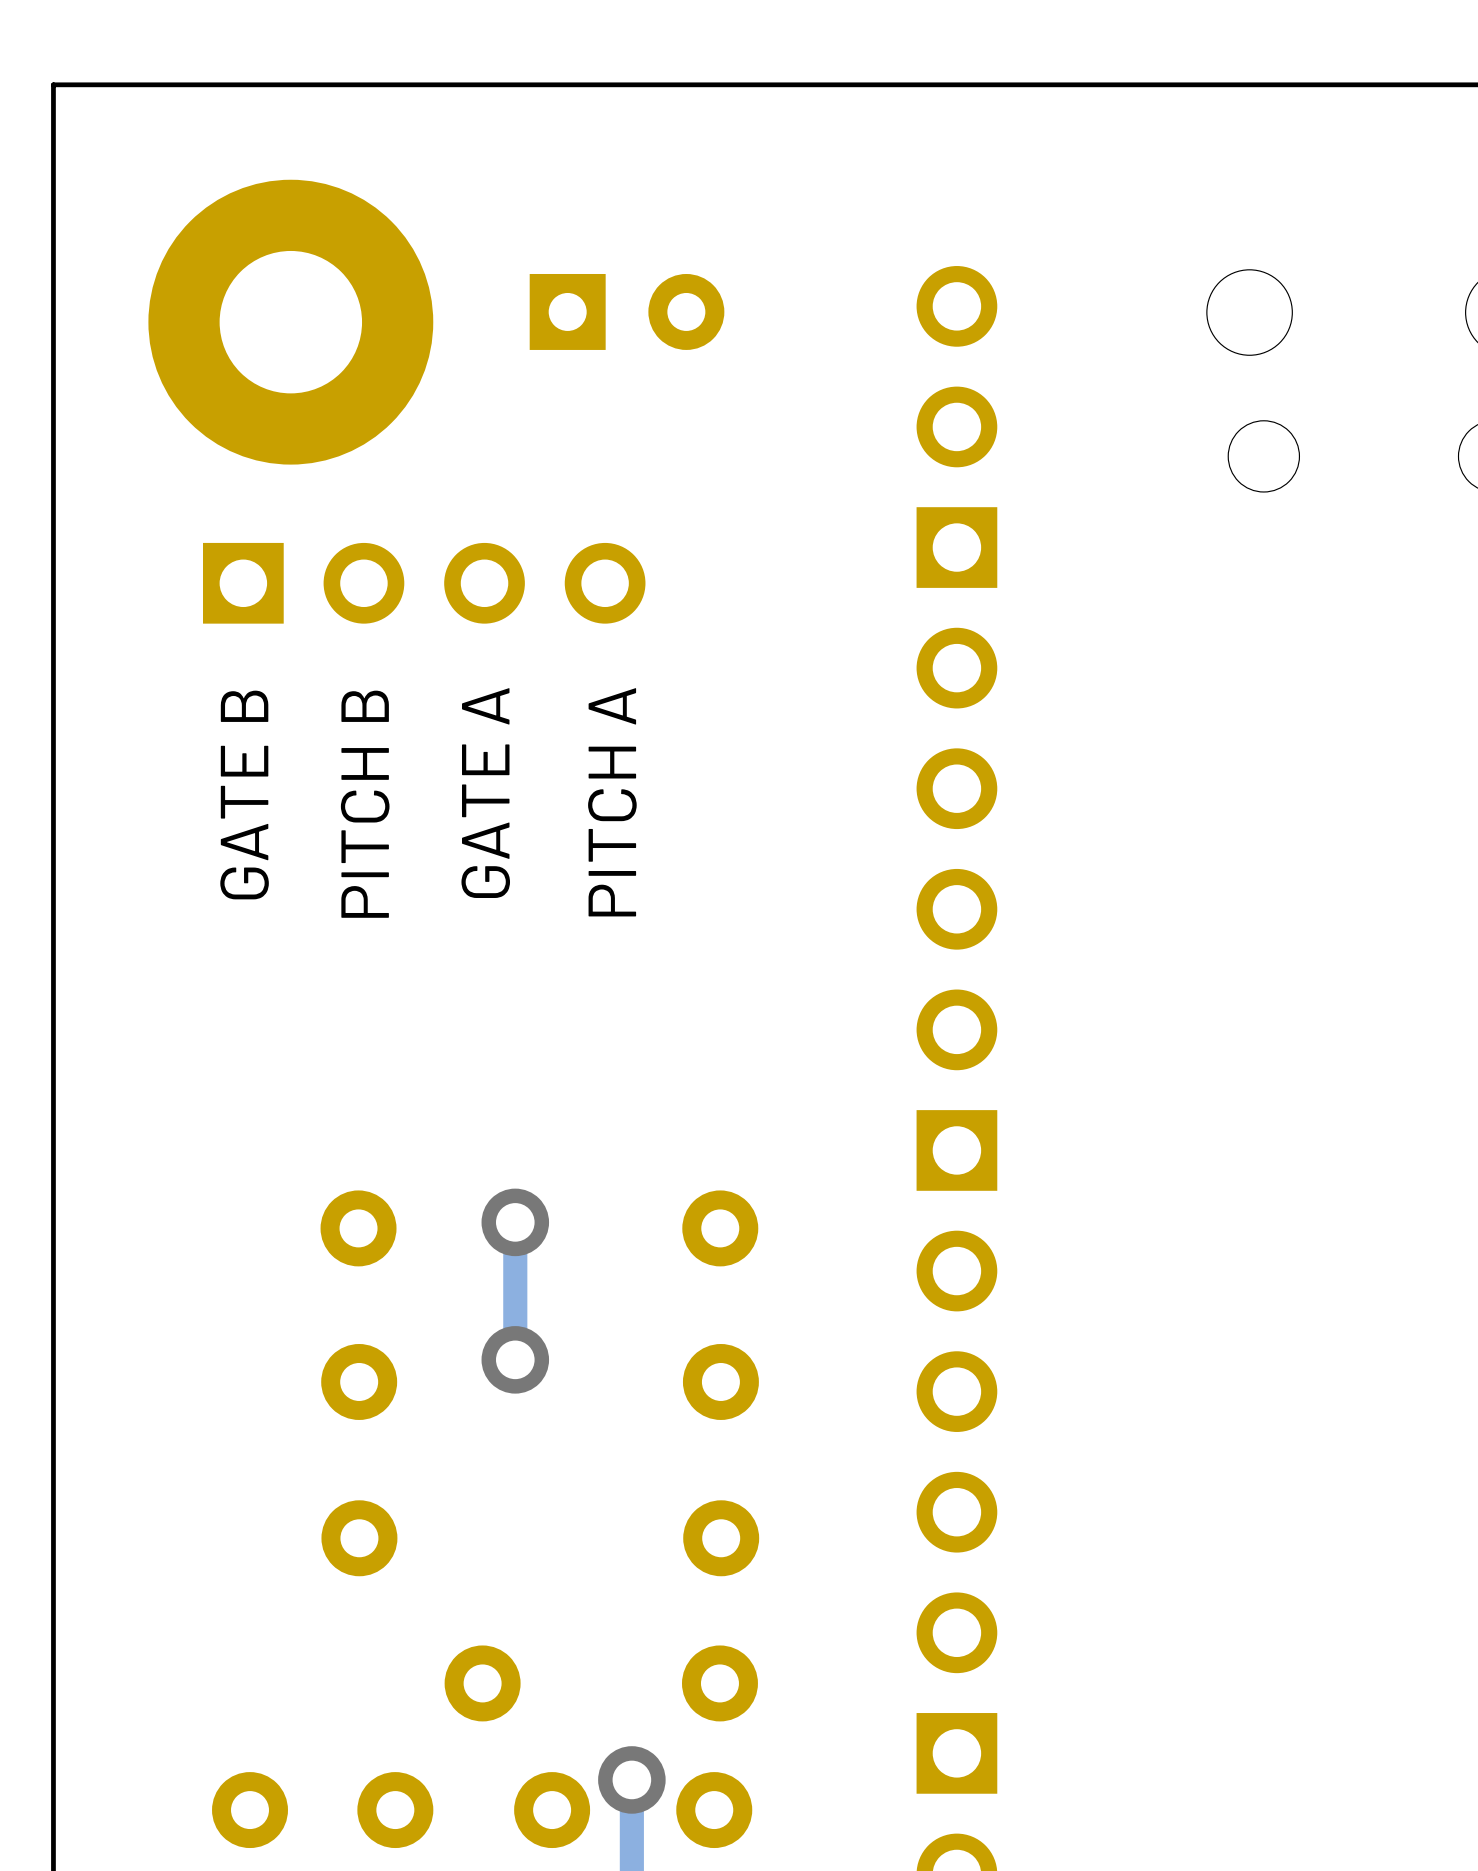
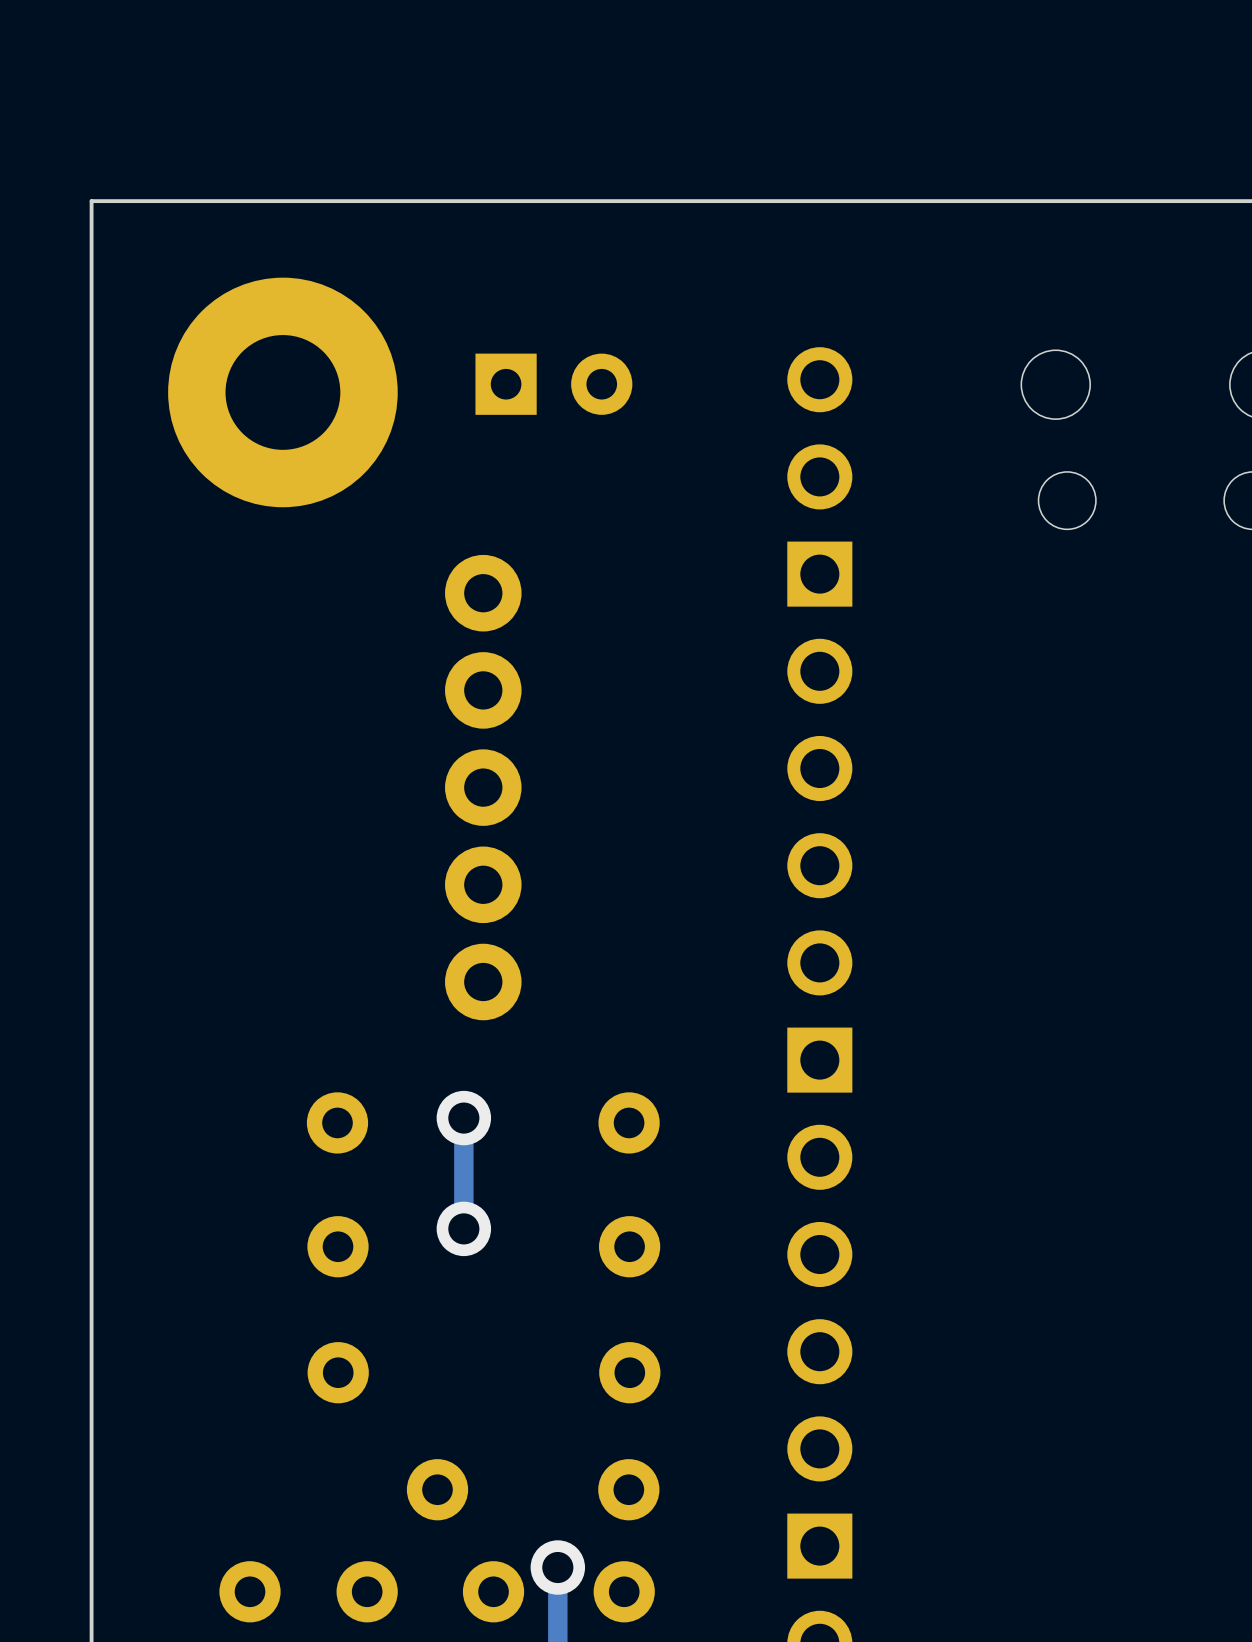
part: (424, 583) -> none
text: GATE A (485, 793) -> none
text: GATE B (244, 795) -> none
text: PITCH A (612, 802) -> none
text: PITCH B (365, 804) -> none
part: none -> (483, 787)

